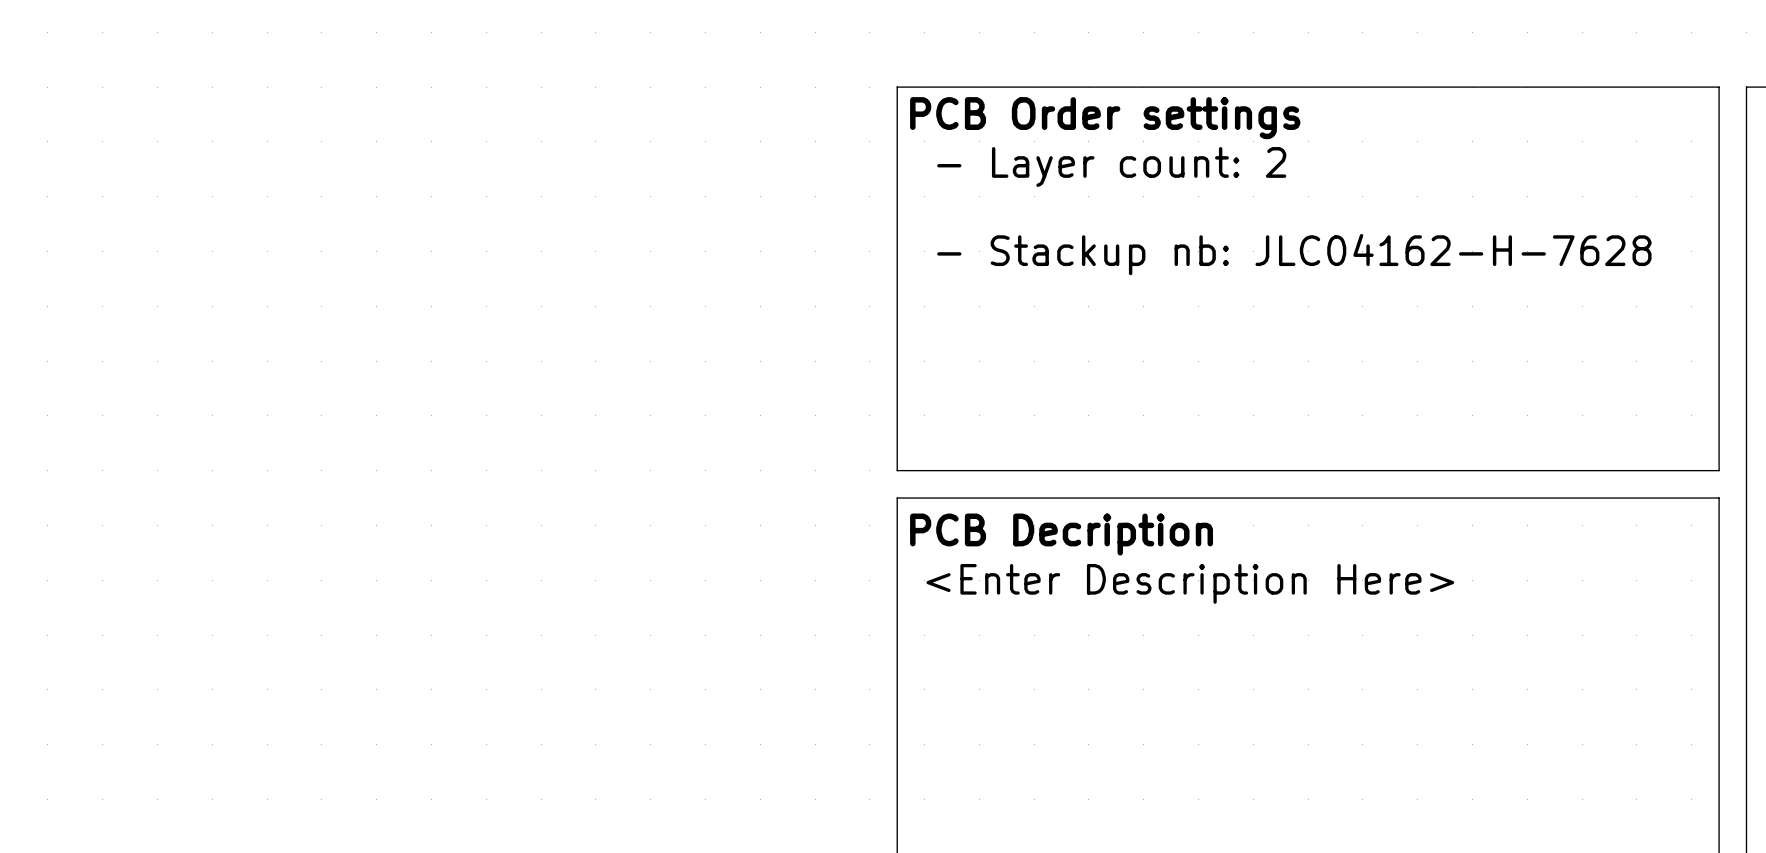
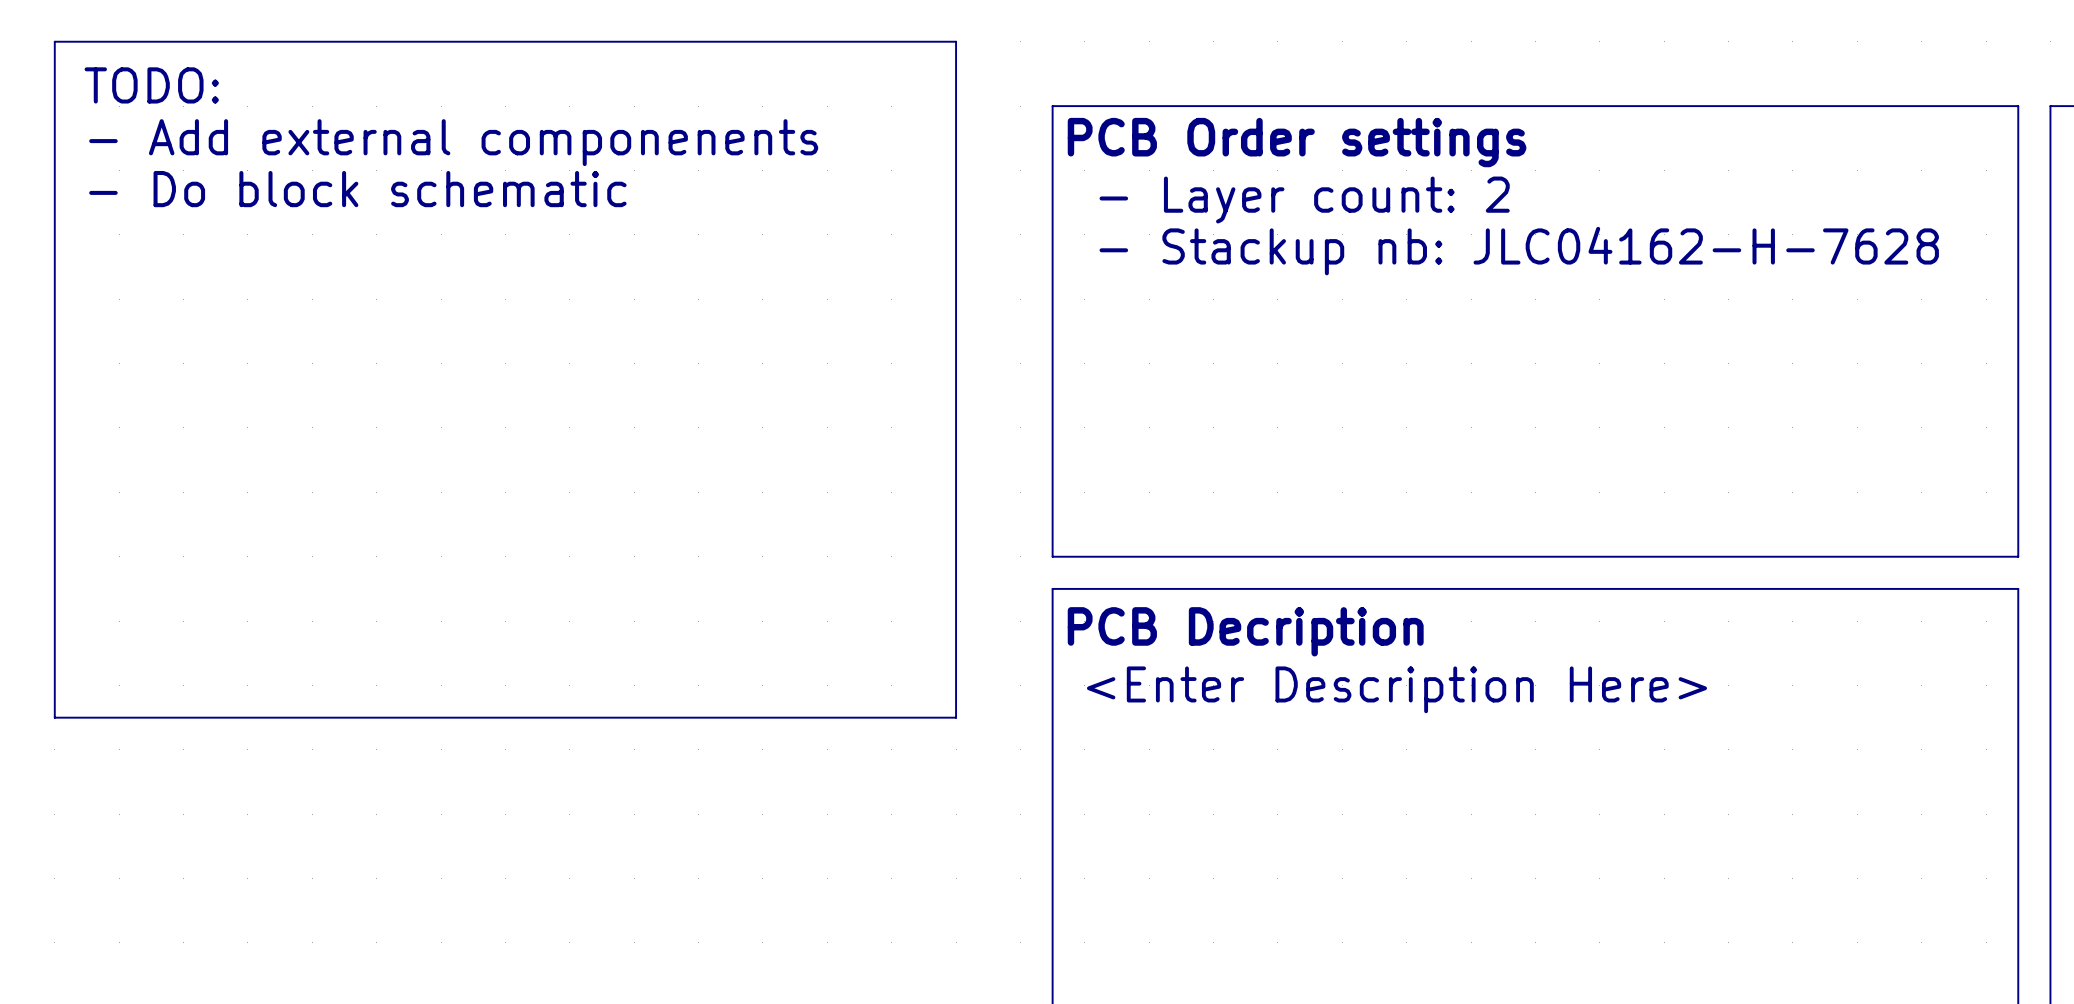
line: none -> (54, 41) (956, 41) (956, 717) (54, 717) (54, 41)
text: none -> TODO: (151, 85)
text: none -> - Add external componenents (453, 142)
text: none -> - Do block schematic (357, 189)
text position: - Stackup nb: JLC04162-H-7628 (1294, 254) -> - Stackup nb: JLC04162-H-7628 (1519, 251)

